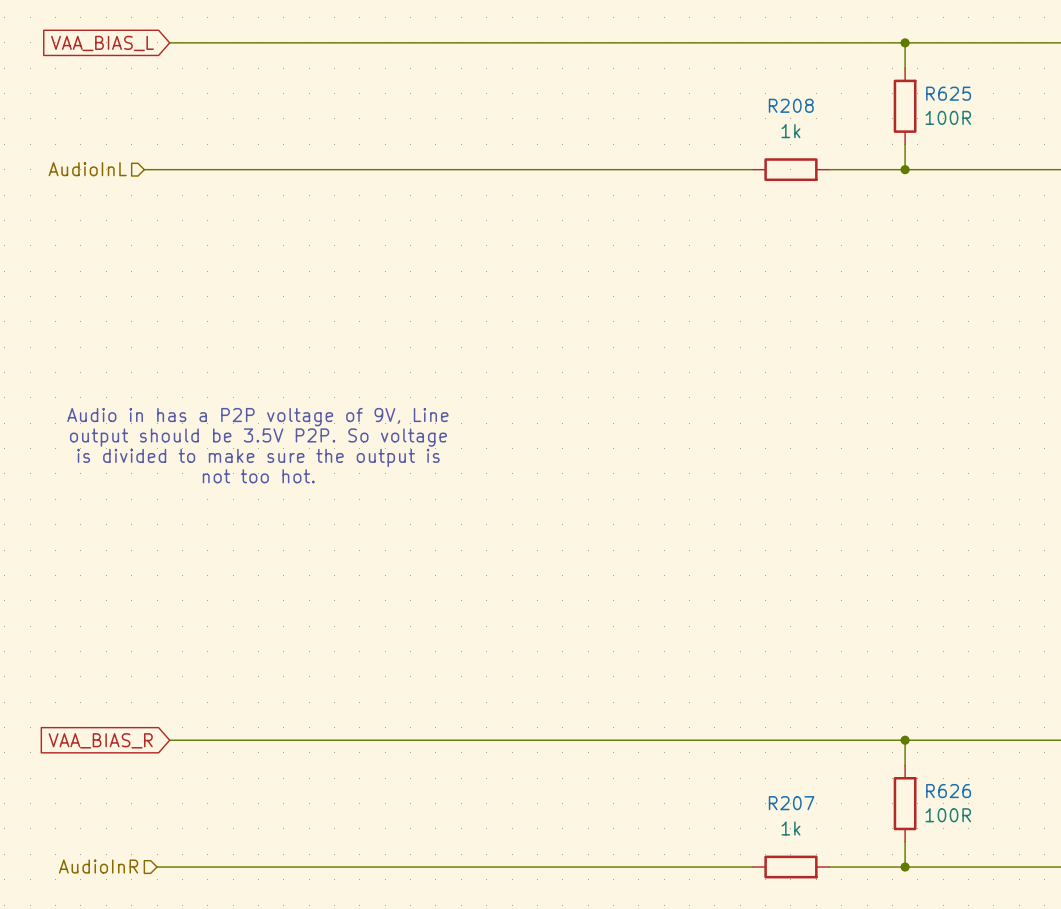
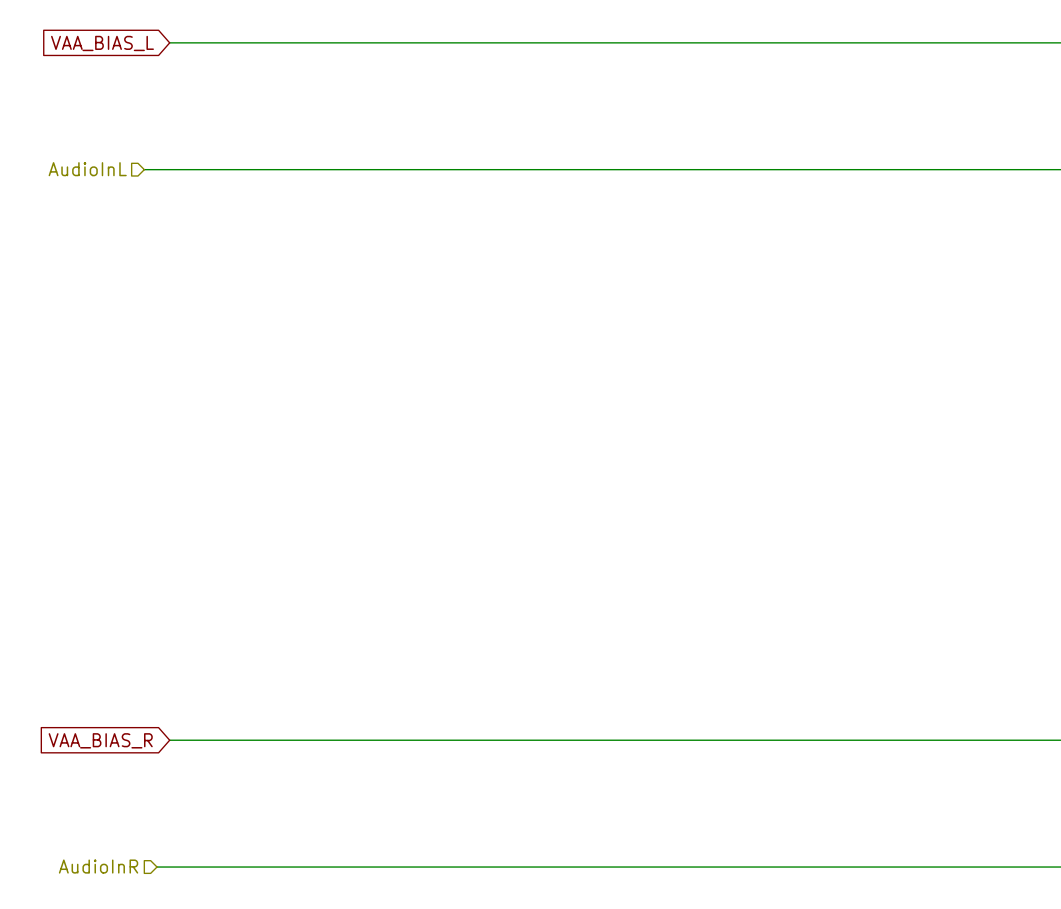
wire: (905, 42) (905, 68) -> none
junction: (905, 42) -> none
R625: 100R (905, 106) -> none
wire: (905, 144) (905, 169) -> none
wire: none -> (752, 169) (829, 169)
R208: 1k (790, 169) -> none
junction: (905, 169) -> none
text: Audio in has a P2P voltage of 9V, Line (257, 417) -> none
text: output should be 3.5V P2P. So voltage (258, 437) -> none
text: is divided to make sure the output is (258, 457) -> none
text: not too hot. (258, 476) -> none
wire: (905, 740) (905, 765) -> none
junction: (905, 740) -> none
R626: 100R (905, 803) -> none
wire: (905, 841) (905, 867) -> none
wire: none -> (752, 867) (829, 867)
R207: 1k (790, 867) -> none
junction: (905, 867) -> none

